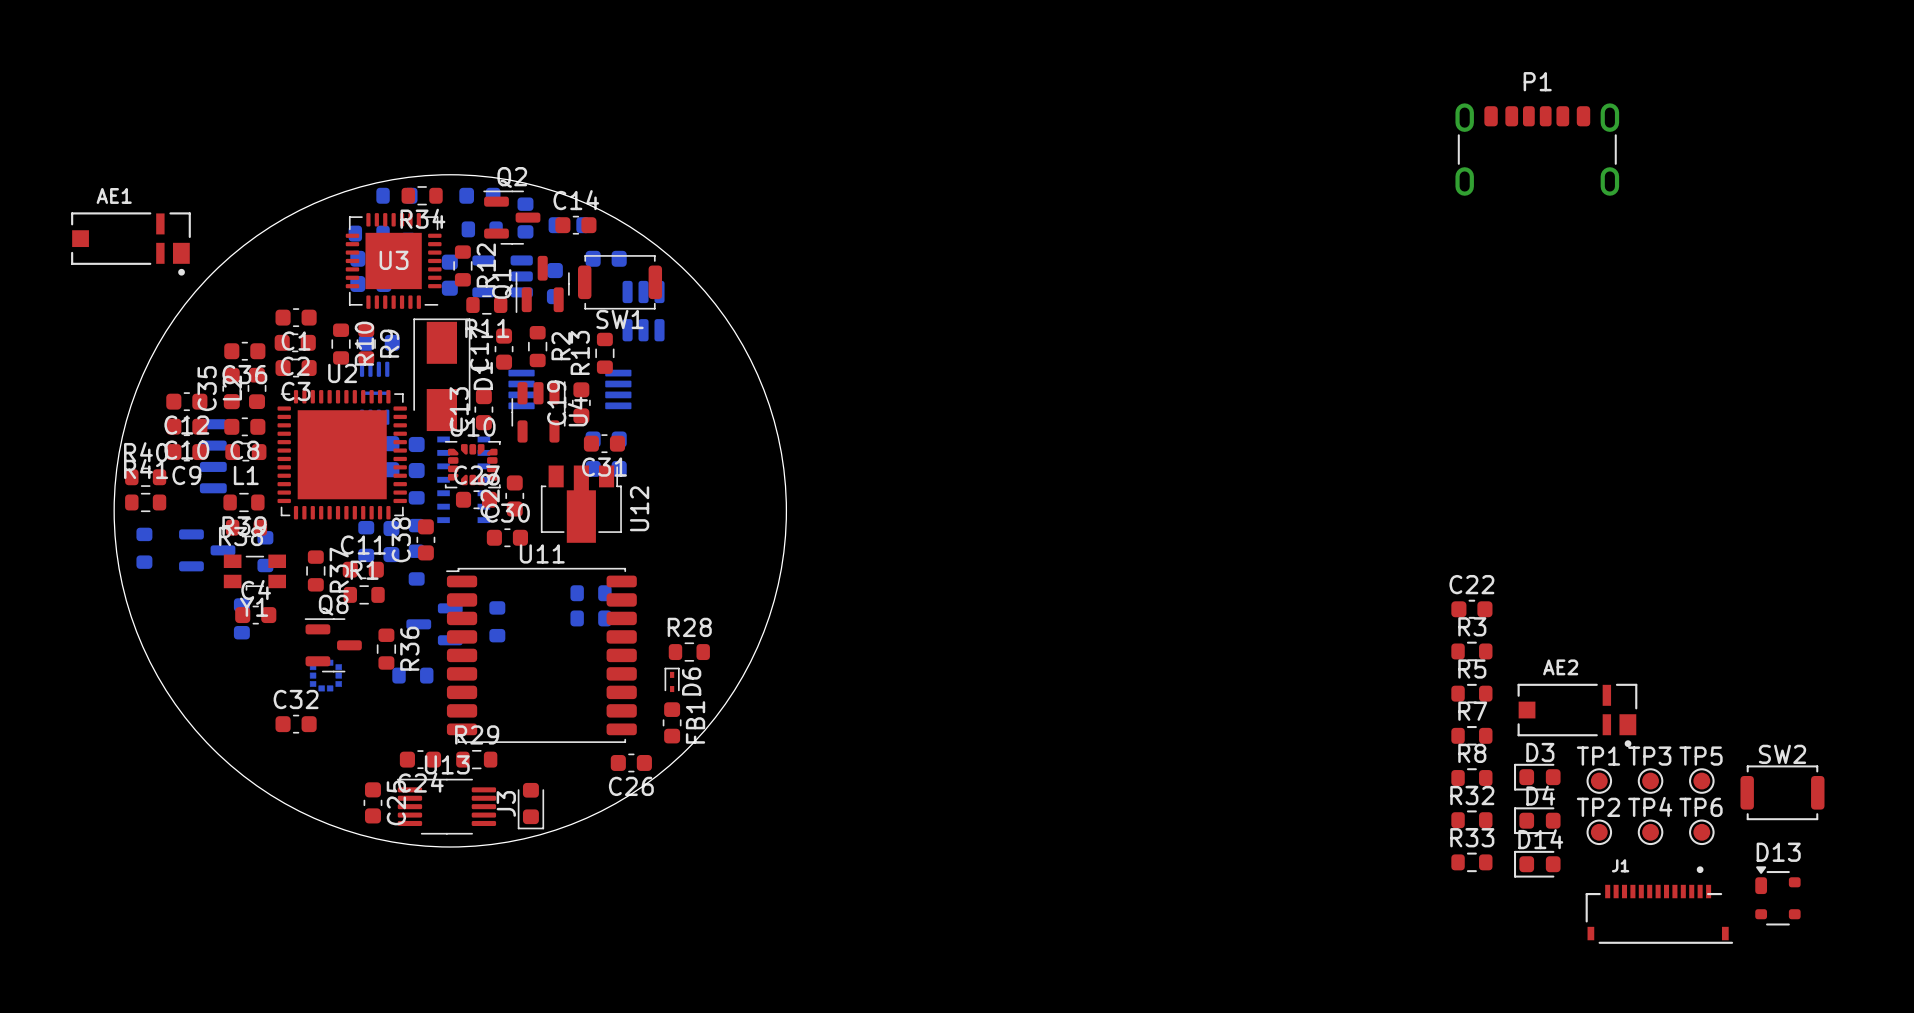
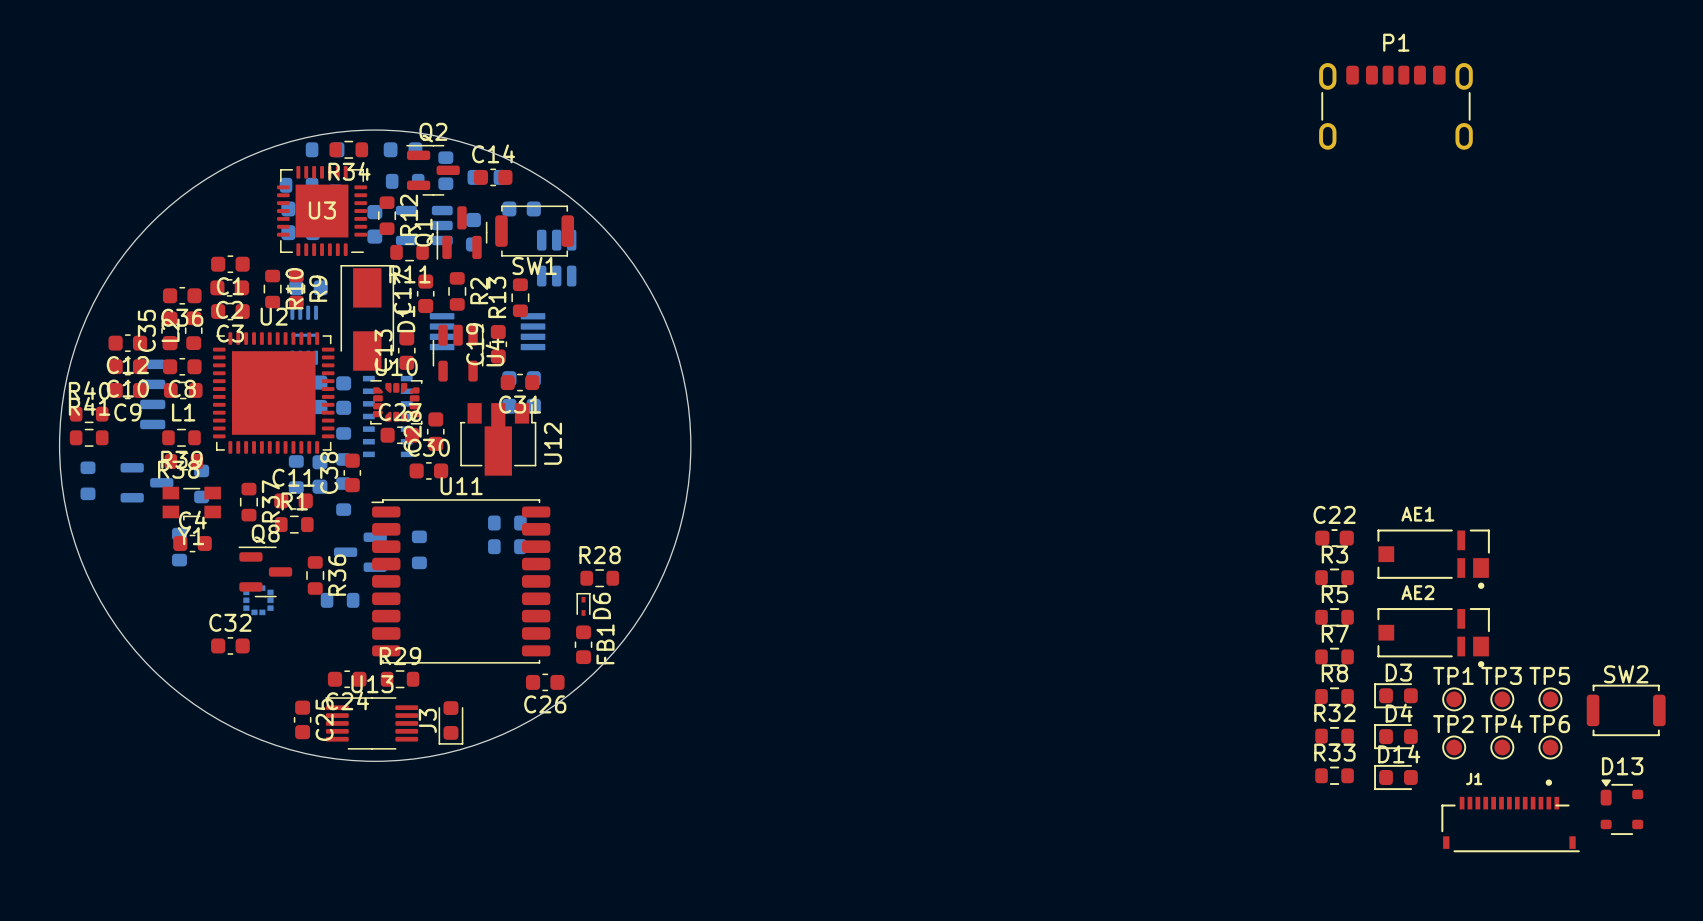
AE1 position: (130, 243) -> (1433, 559)

